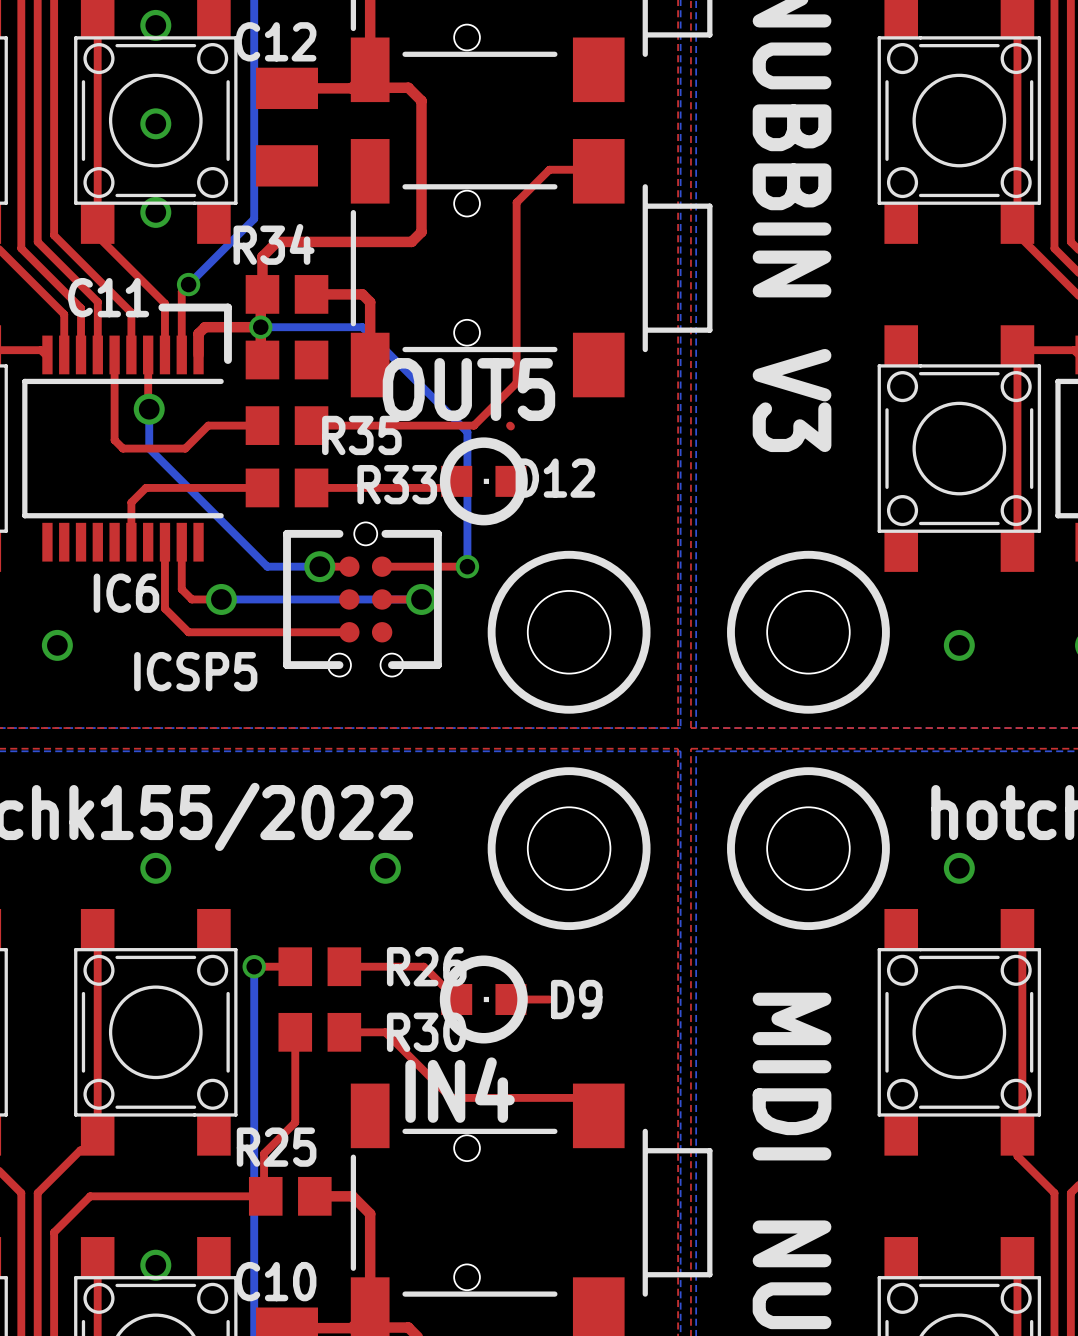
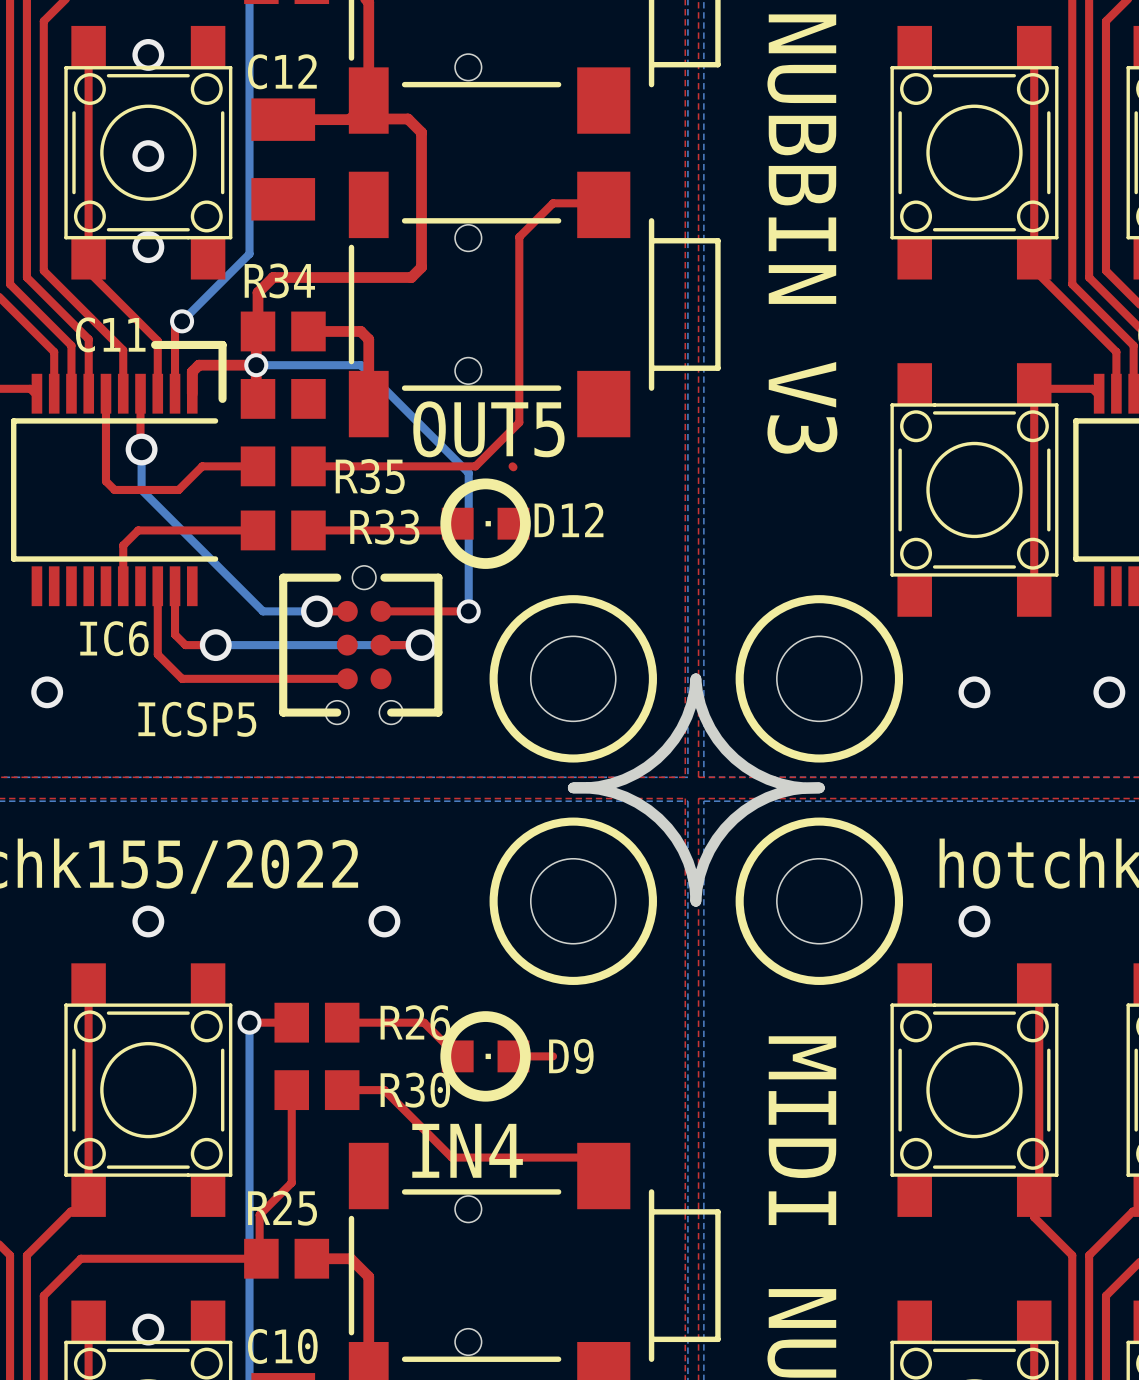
board edge: none -> (695, 678) (691, 704) (681, 728) (657, 758) (624, 779) (599, 786) (573, 787) (599, 789) (625, 796) (648, 810) (658, 818) (667, 828) (682, 850) (692, 874) (695, 901) (704, 862) (716, 839) (734, 819) (767, 797) (792, 789) (819, 787) (793, 786) (768, 779) (735, 758) (710, 728) (700, 704) (695, 678)

